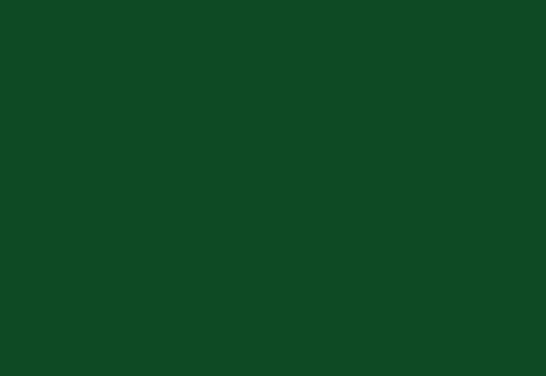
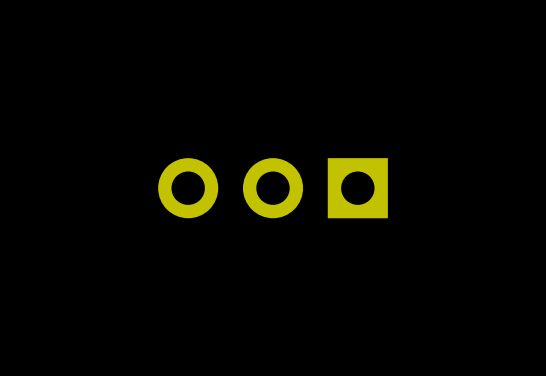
part: none -> (273, 188)

